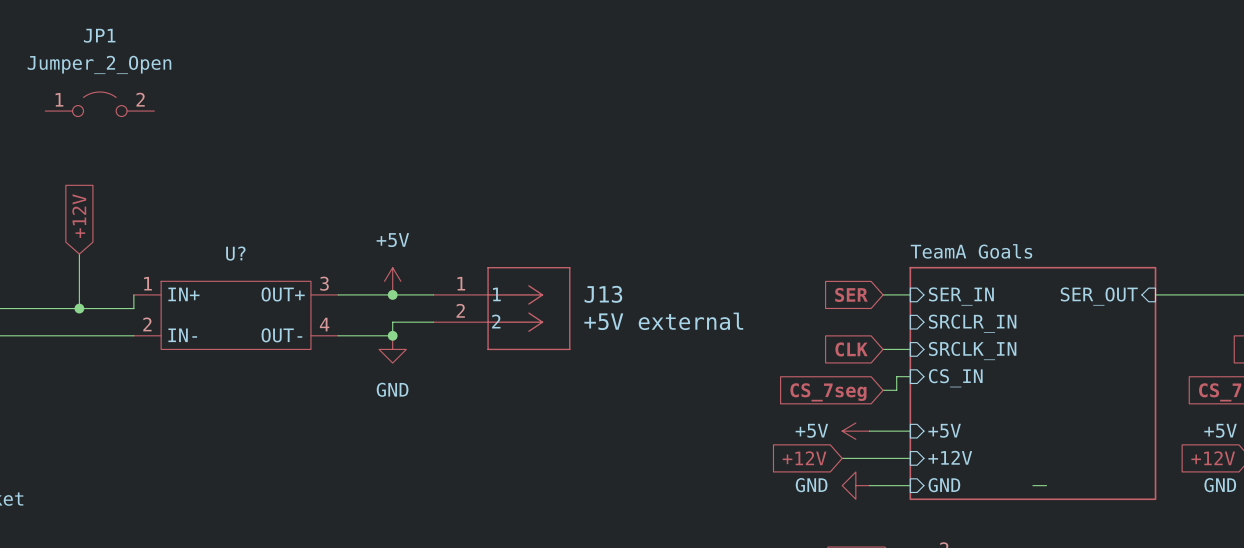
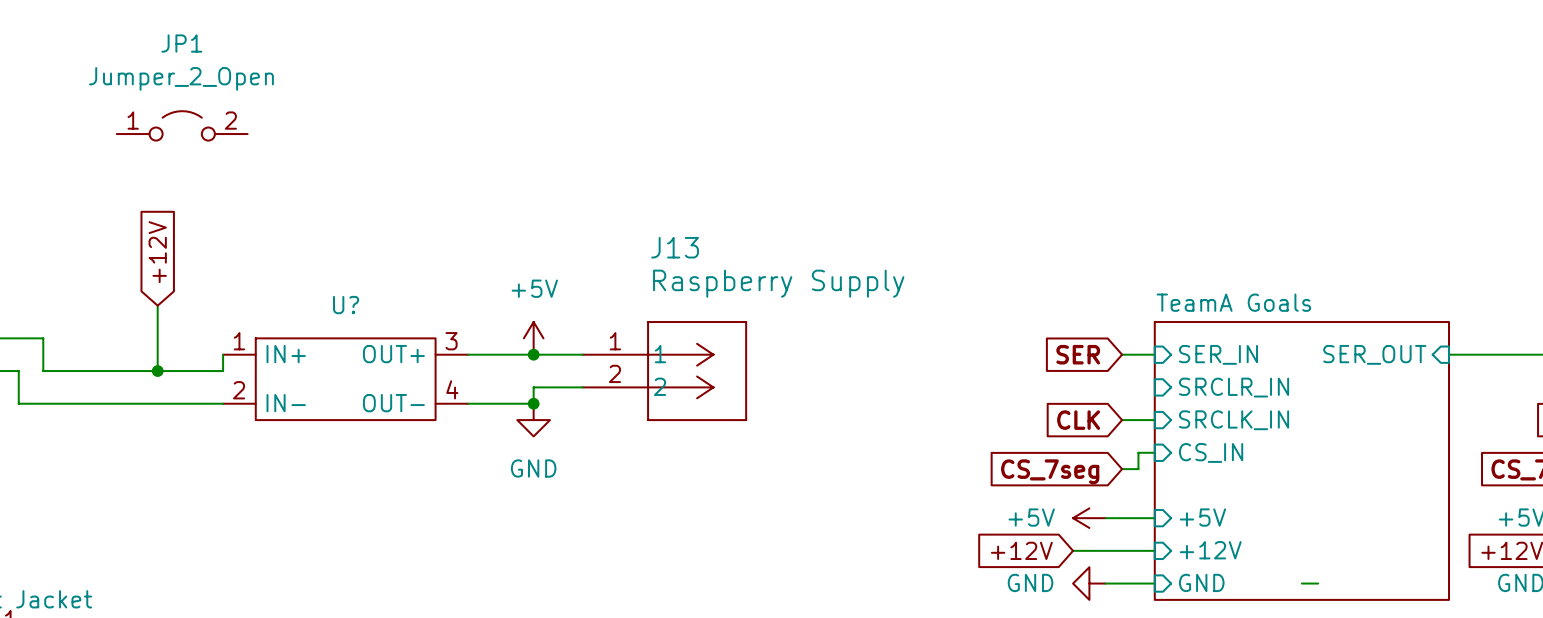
J13 name position: J13 (603, 294) -> J13 (675, 247)
J13 value: +5V external (663, 321) -> Raspberry Supply (778, 283)

